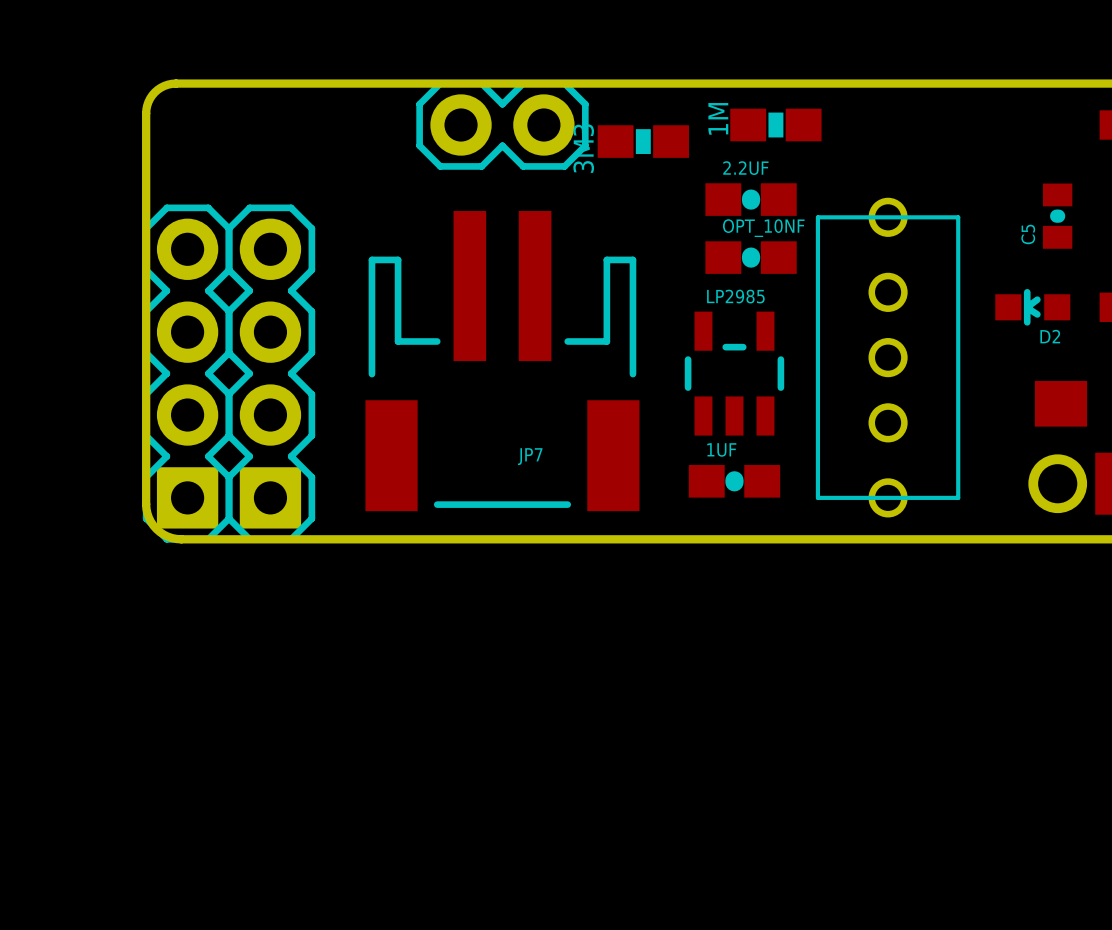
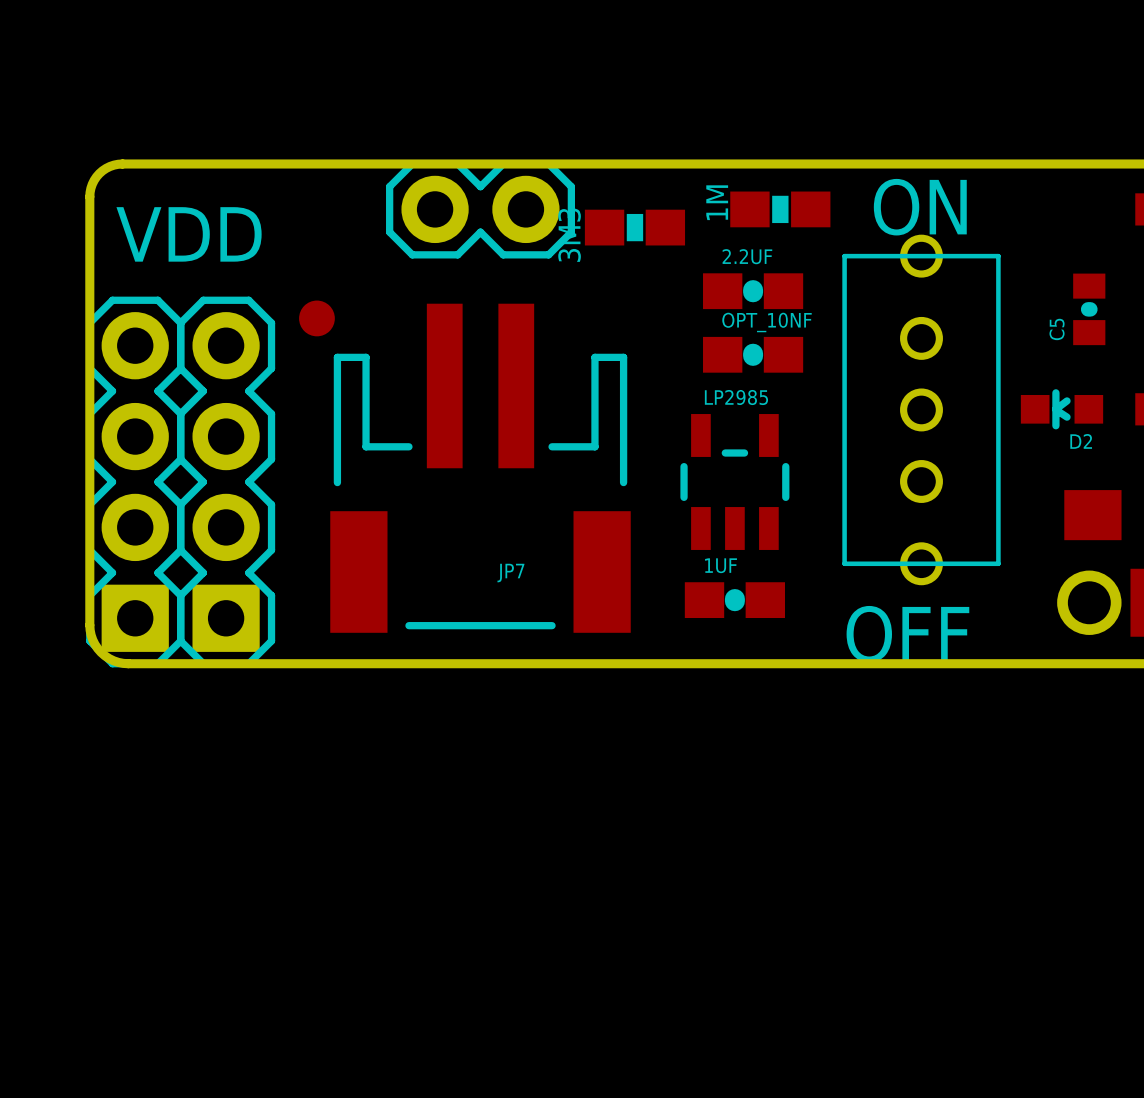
text: none -> ON (920, 207)
text: none -> VDD (189, 234)
part: none -> (316, 318)
part position: (888, 357) -> (921, 409)
text: none -> OFF (907, 634)

